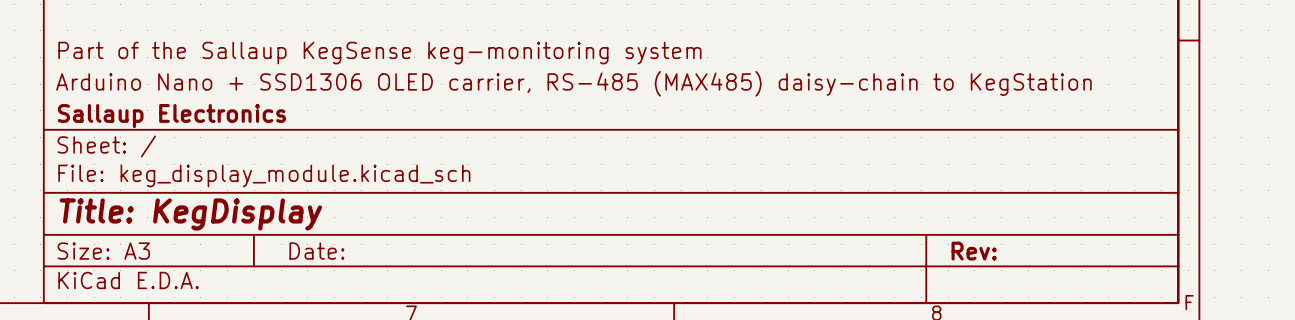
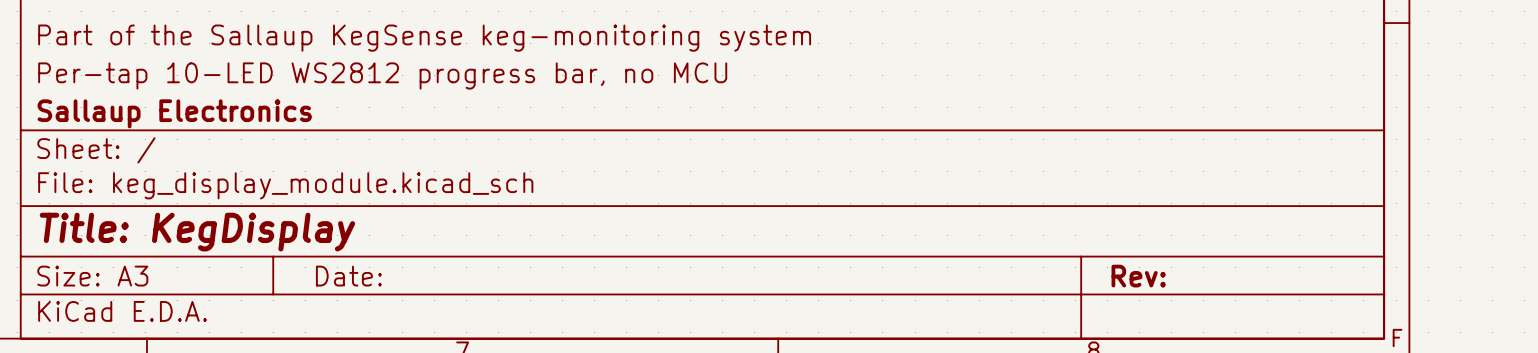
title block: Arduino Nano + SSD1306 OLED carrier, RS-485 (MAX485) daisy-chain to KegStation (573, 83) -> Per-tap 10-LED WS2812 progress bar, no MCU (382, 75)

